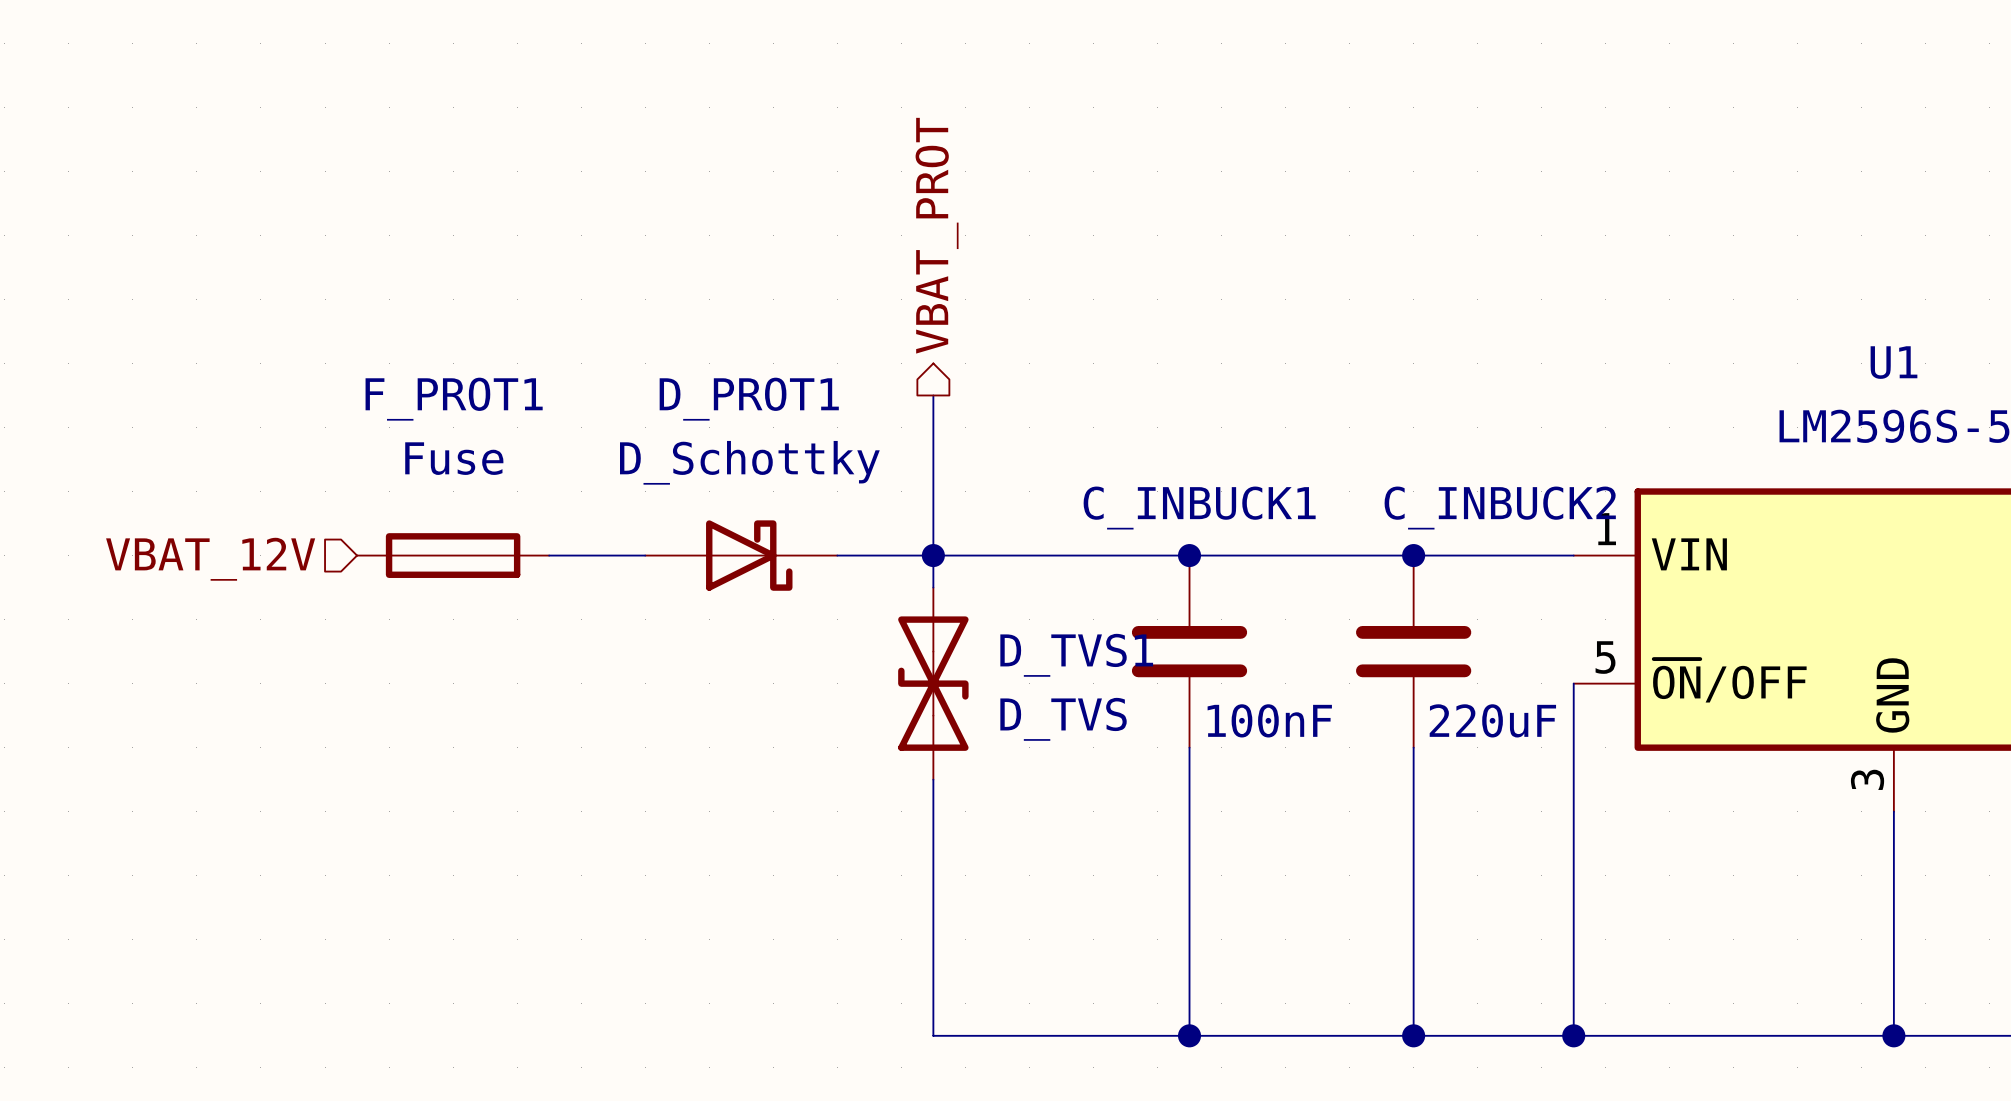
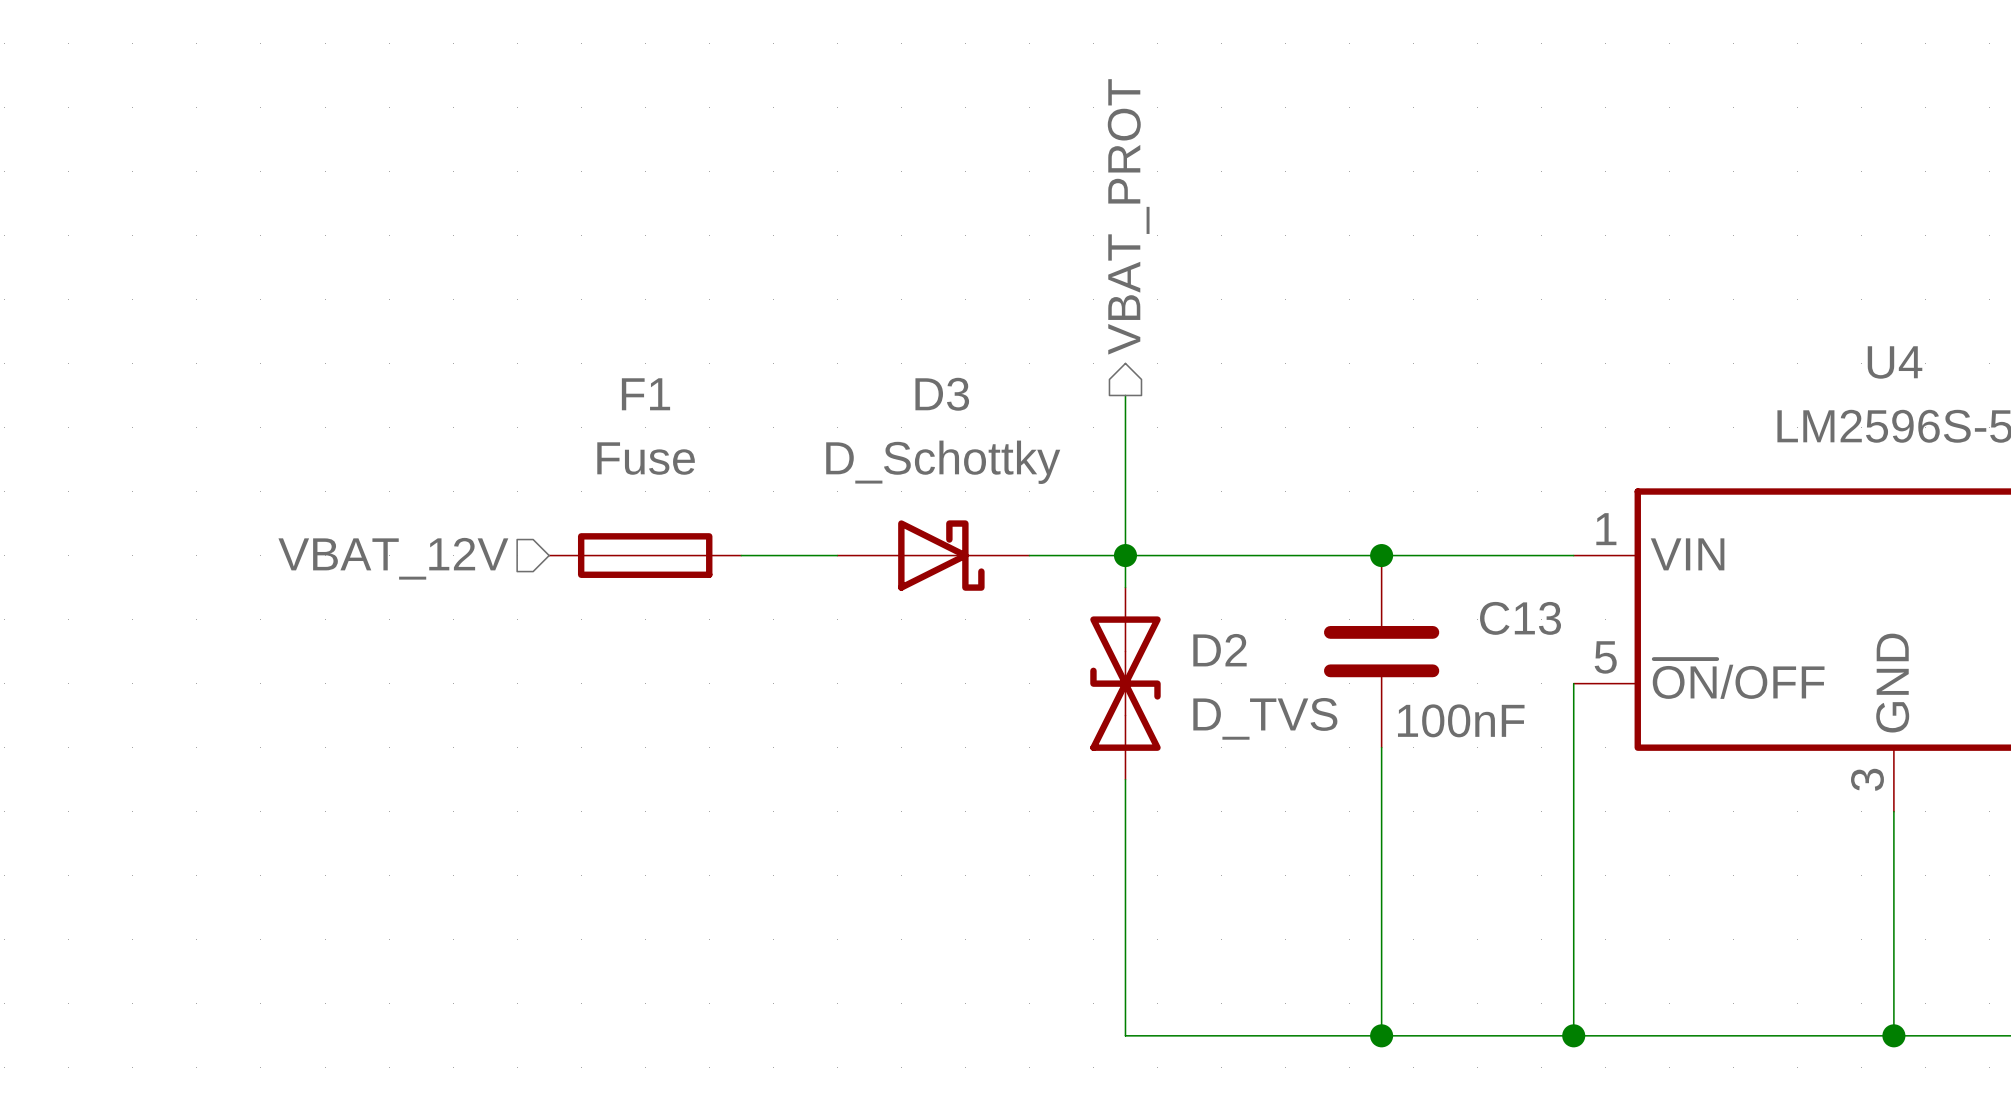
hierarchical label position: VBAT_PROT (937, 235) -> VBAT_PROT (1128, 216)
U1 name: U1 (1893, 362) -> U4 (1895, 362)
wire: (933, 395) (933, 587) -> (1125, 395) (1125, 587)
F_PROT1: Fuse (453, 555) -> none
F1: none -> Fuse (645, 555)
D_PROT1: D_Schottky (741, 555) -> none
junction: (933, 555) -> none
D3: none -> D_Schottky (933, 555)
junction position: (1189, 555) -> (1125, 555)
junction position: (1413, 555) -> (1381, 555)
hierarchical label position: VBAT_12V (210, 559) -> VBAT_12V (393, 558)
C_INBUCK1: 100nF (1189, 651) -> none
C13: none -> 100nF (1381, 651)
C_INBUCK2: 220uF (1413, 651) -> none
D_TVS1: D_TVS (933, 683) -> none
D2: none -> D_TVS (1125, 683)
wire: (1189, 747) (1189, 1035) -> (1381, 747) (1381, 1035)
wire: (1413, 747) (1413, 1035) -> none
wire: (933, 779) (933, 1035) (1125, 1035) -> (1125, 779) (1125, 1035)
junction: (1189, 1035) -> none
junction position: (1413, 1035) -> (1381, 1035)

